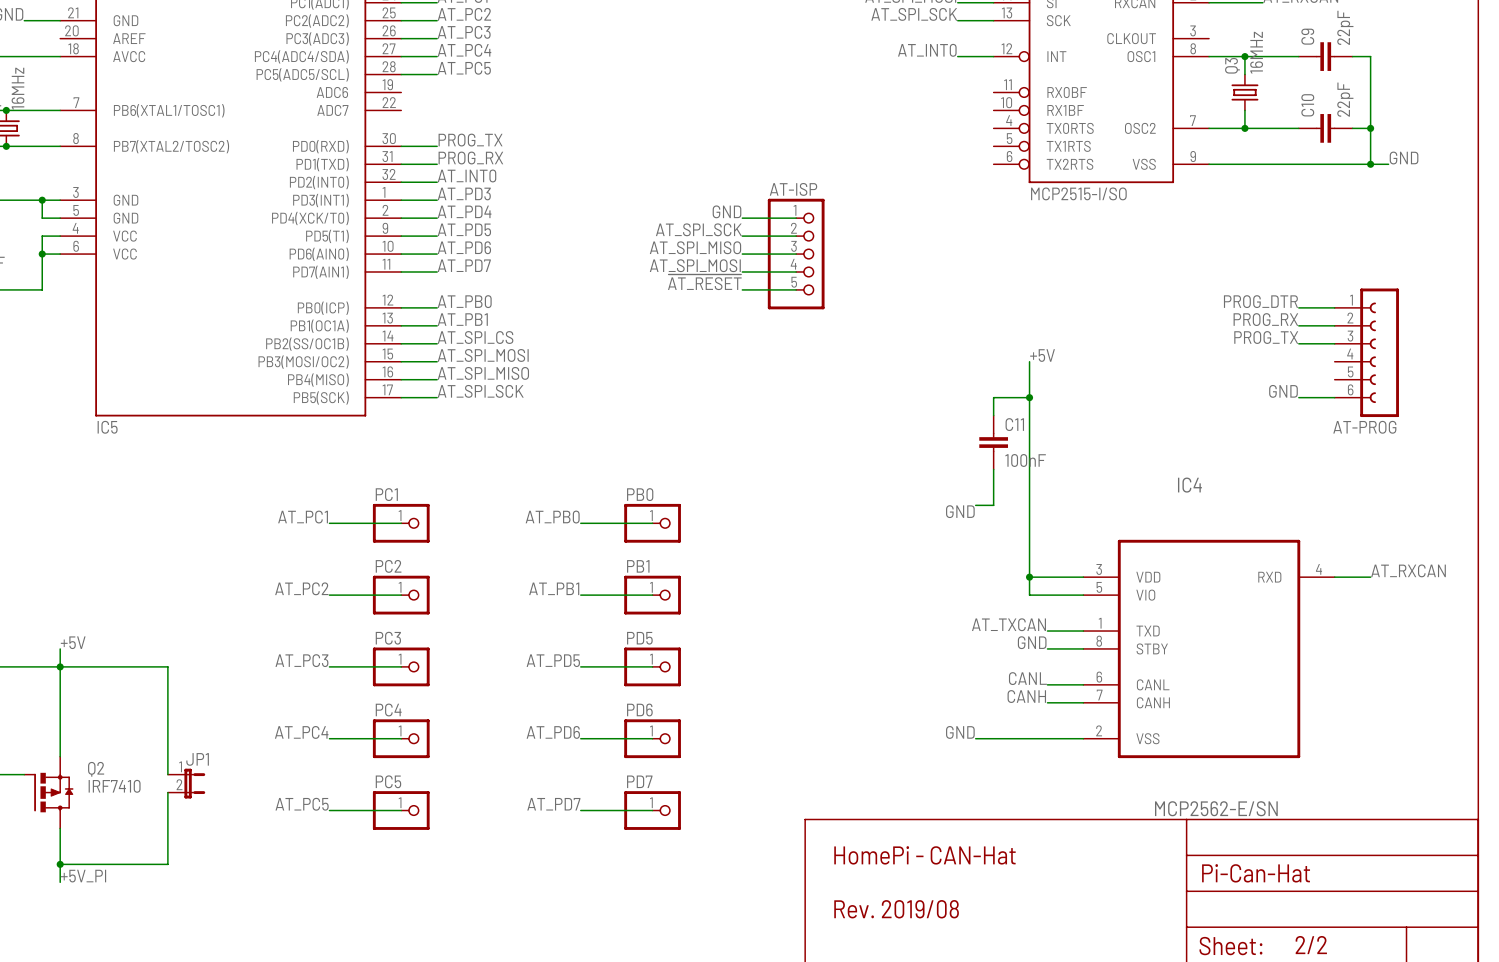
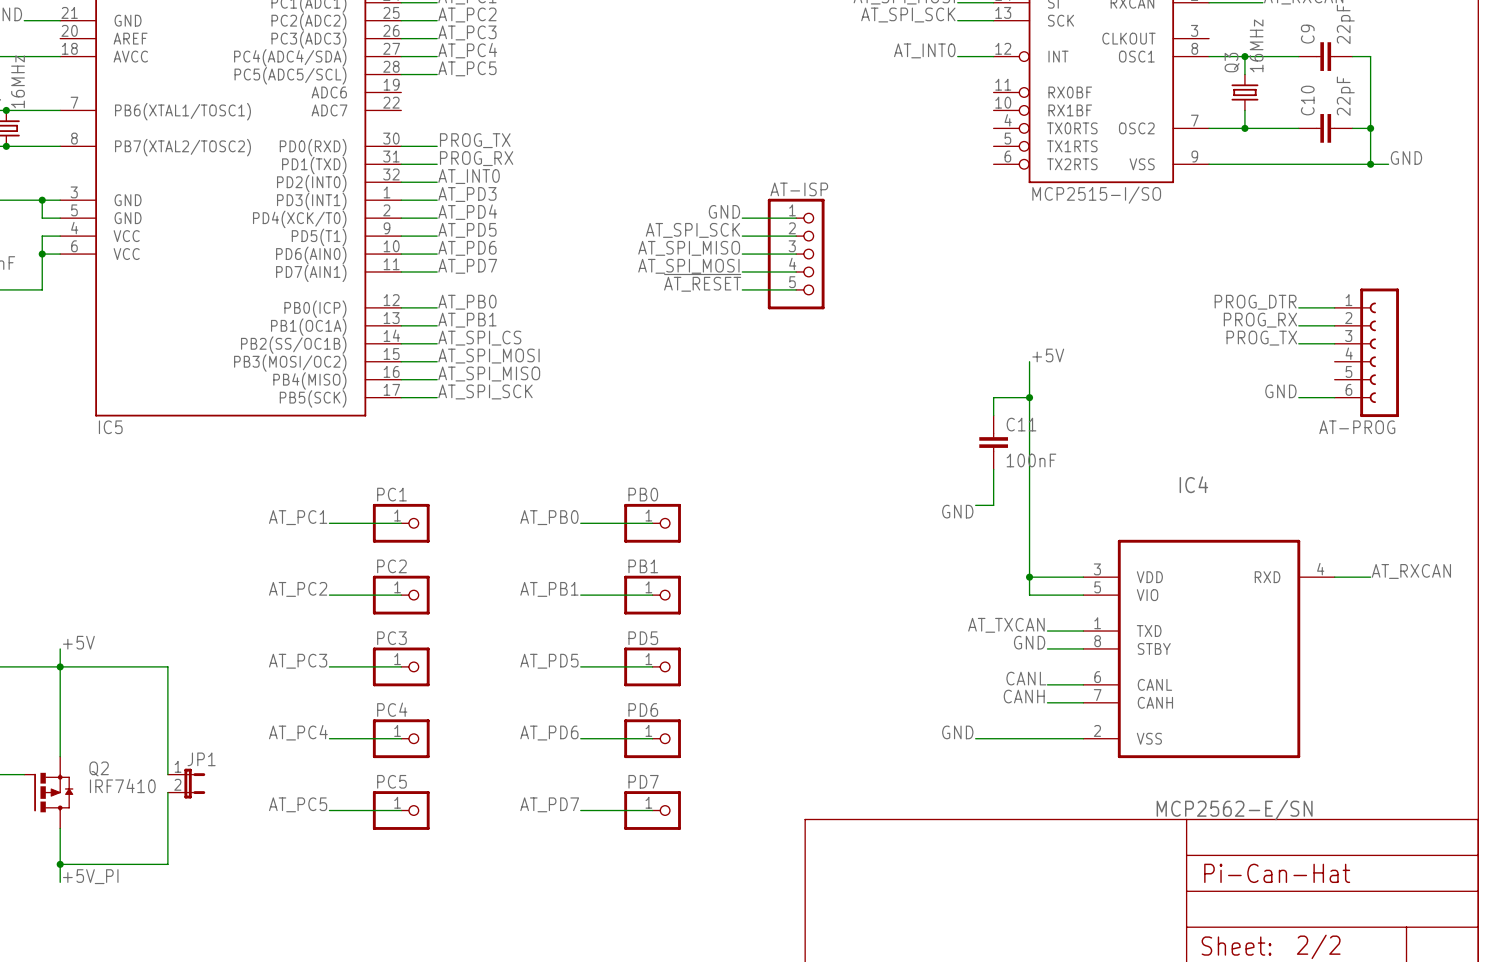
text: HomePi - CAN-Hat (924, 855) -> none
text: Rev. 2019/08 (896, 909) -> none

